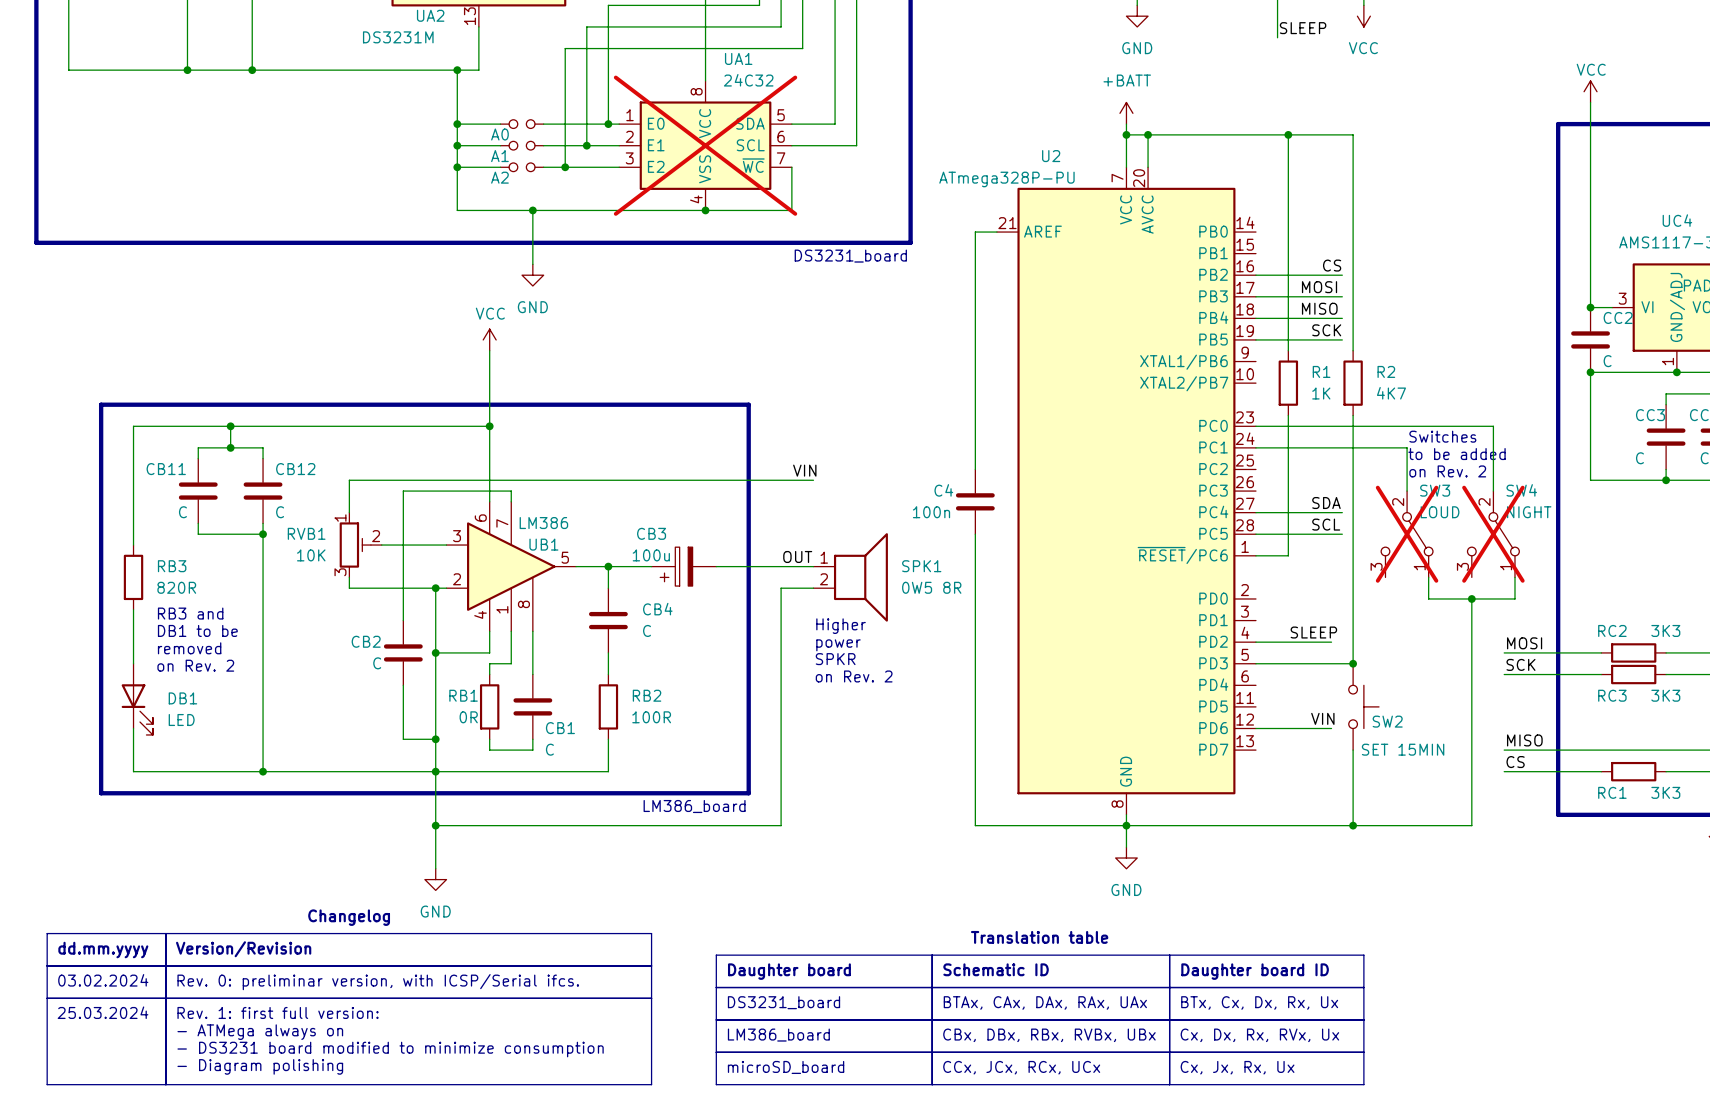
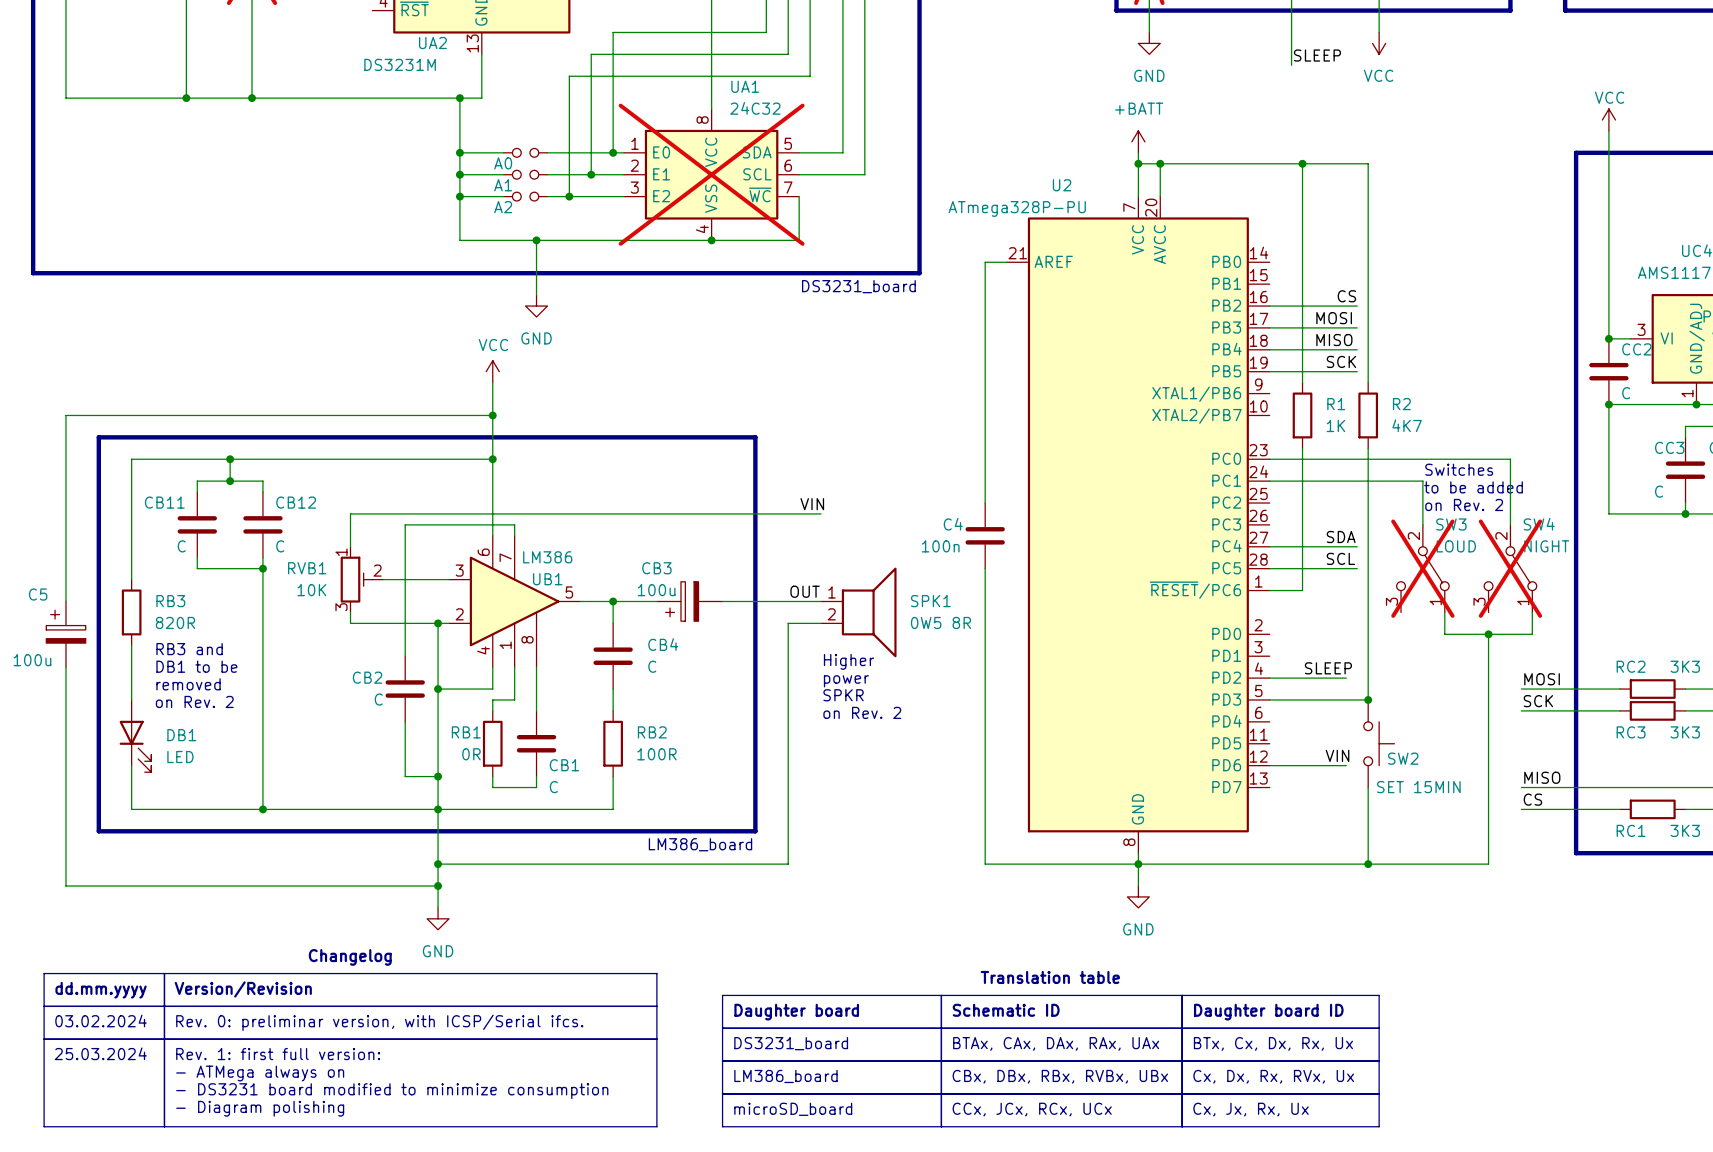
wire: none -> (492, 415) (65, 415) (65, 601)
junction: none -> (492, 415)
C5: none -> 100u (65, 634)
wire: none -> (65, 667) (65, 886) (438, 886)
junction: none -> (438, 886)

